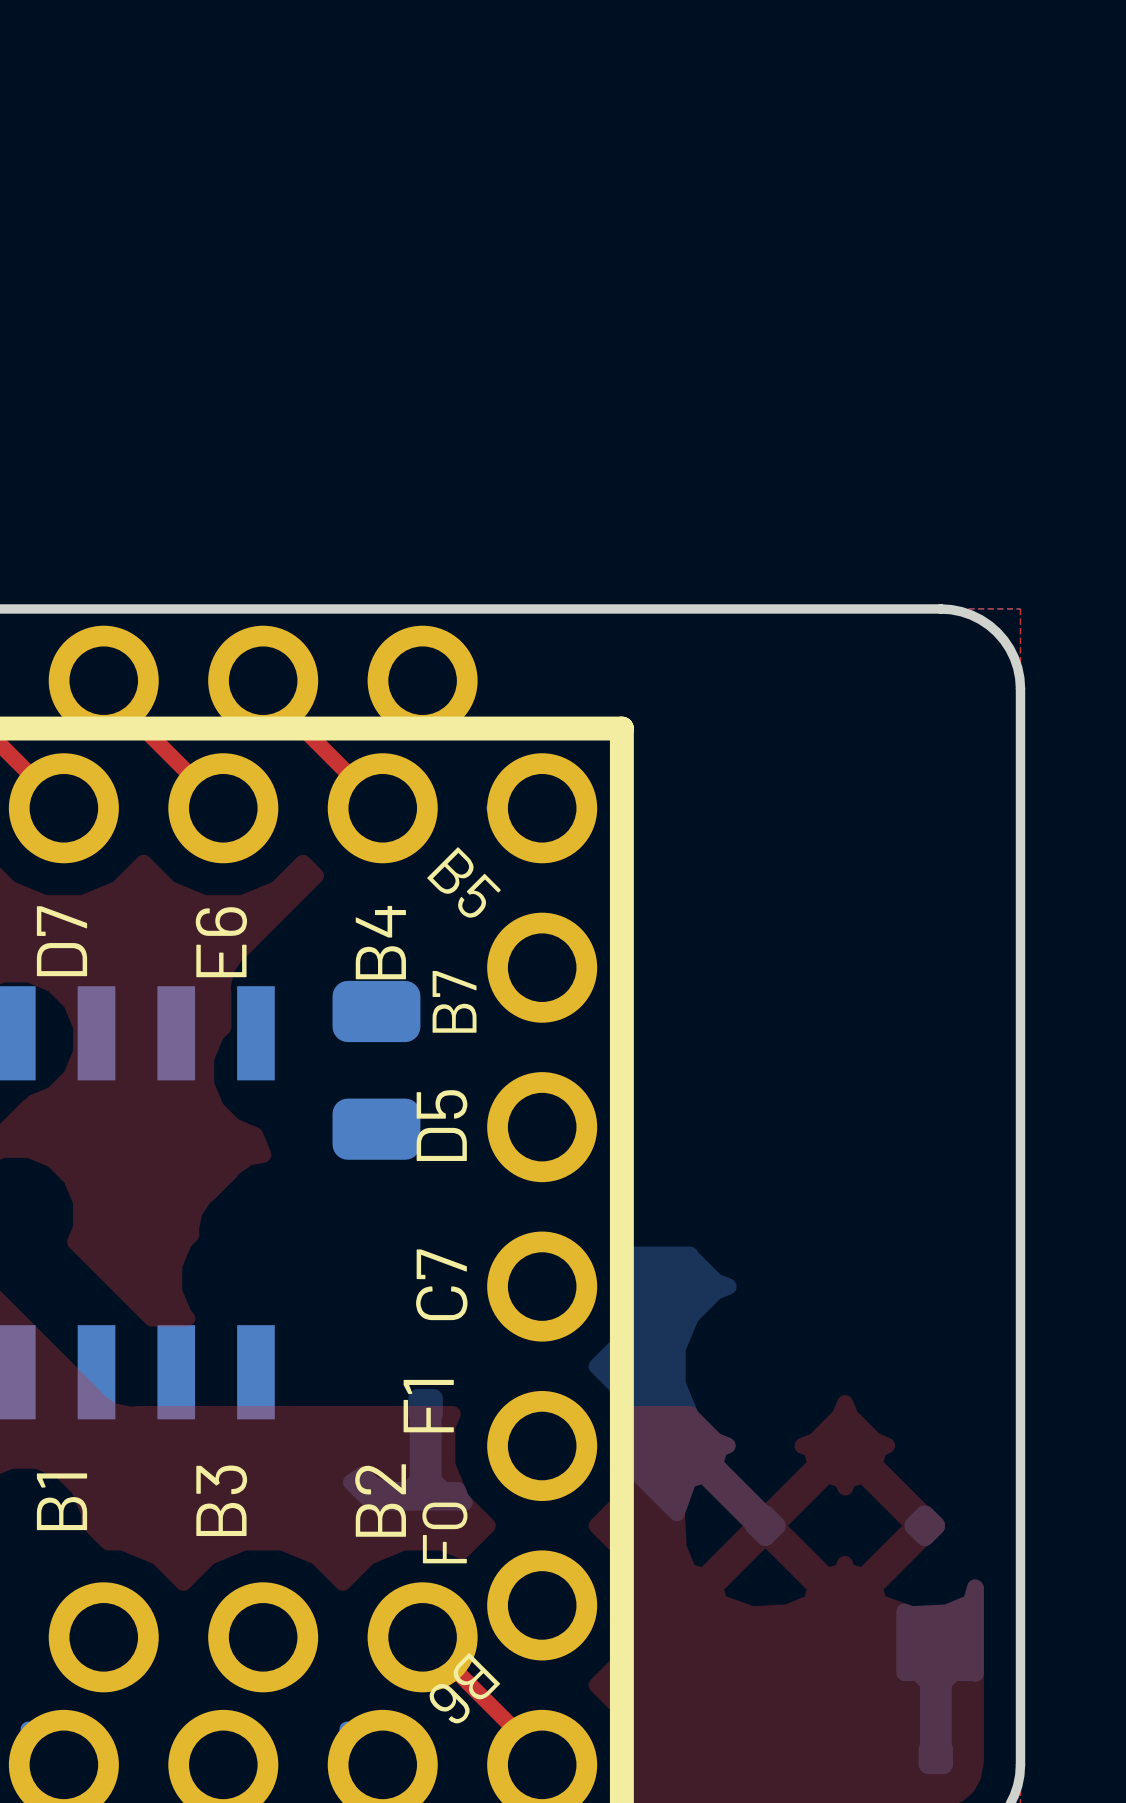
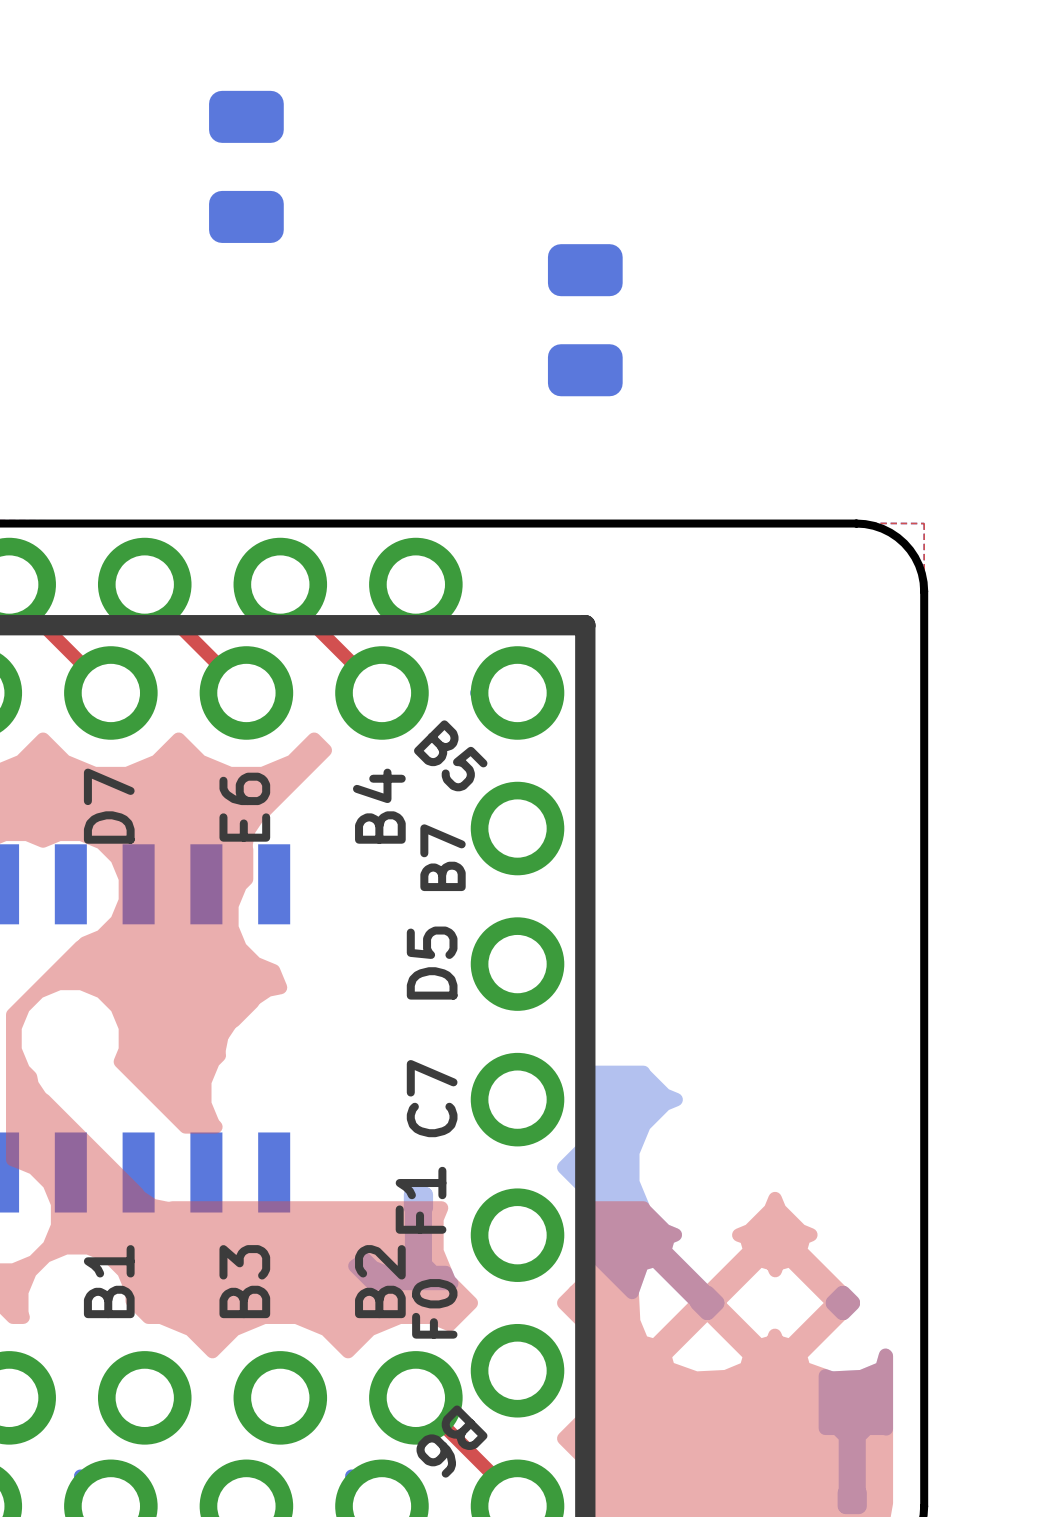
part: none -> (246, 166)
part: none -> (585, 320)
part: (376, 1070) -> none

